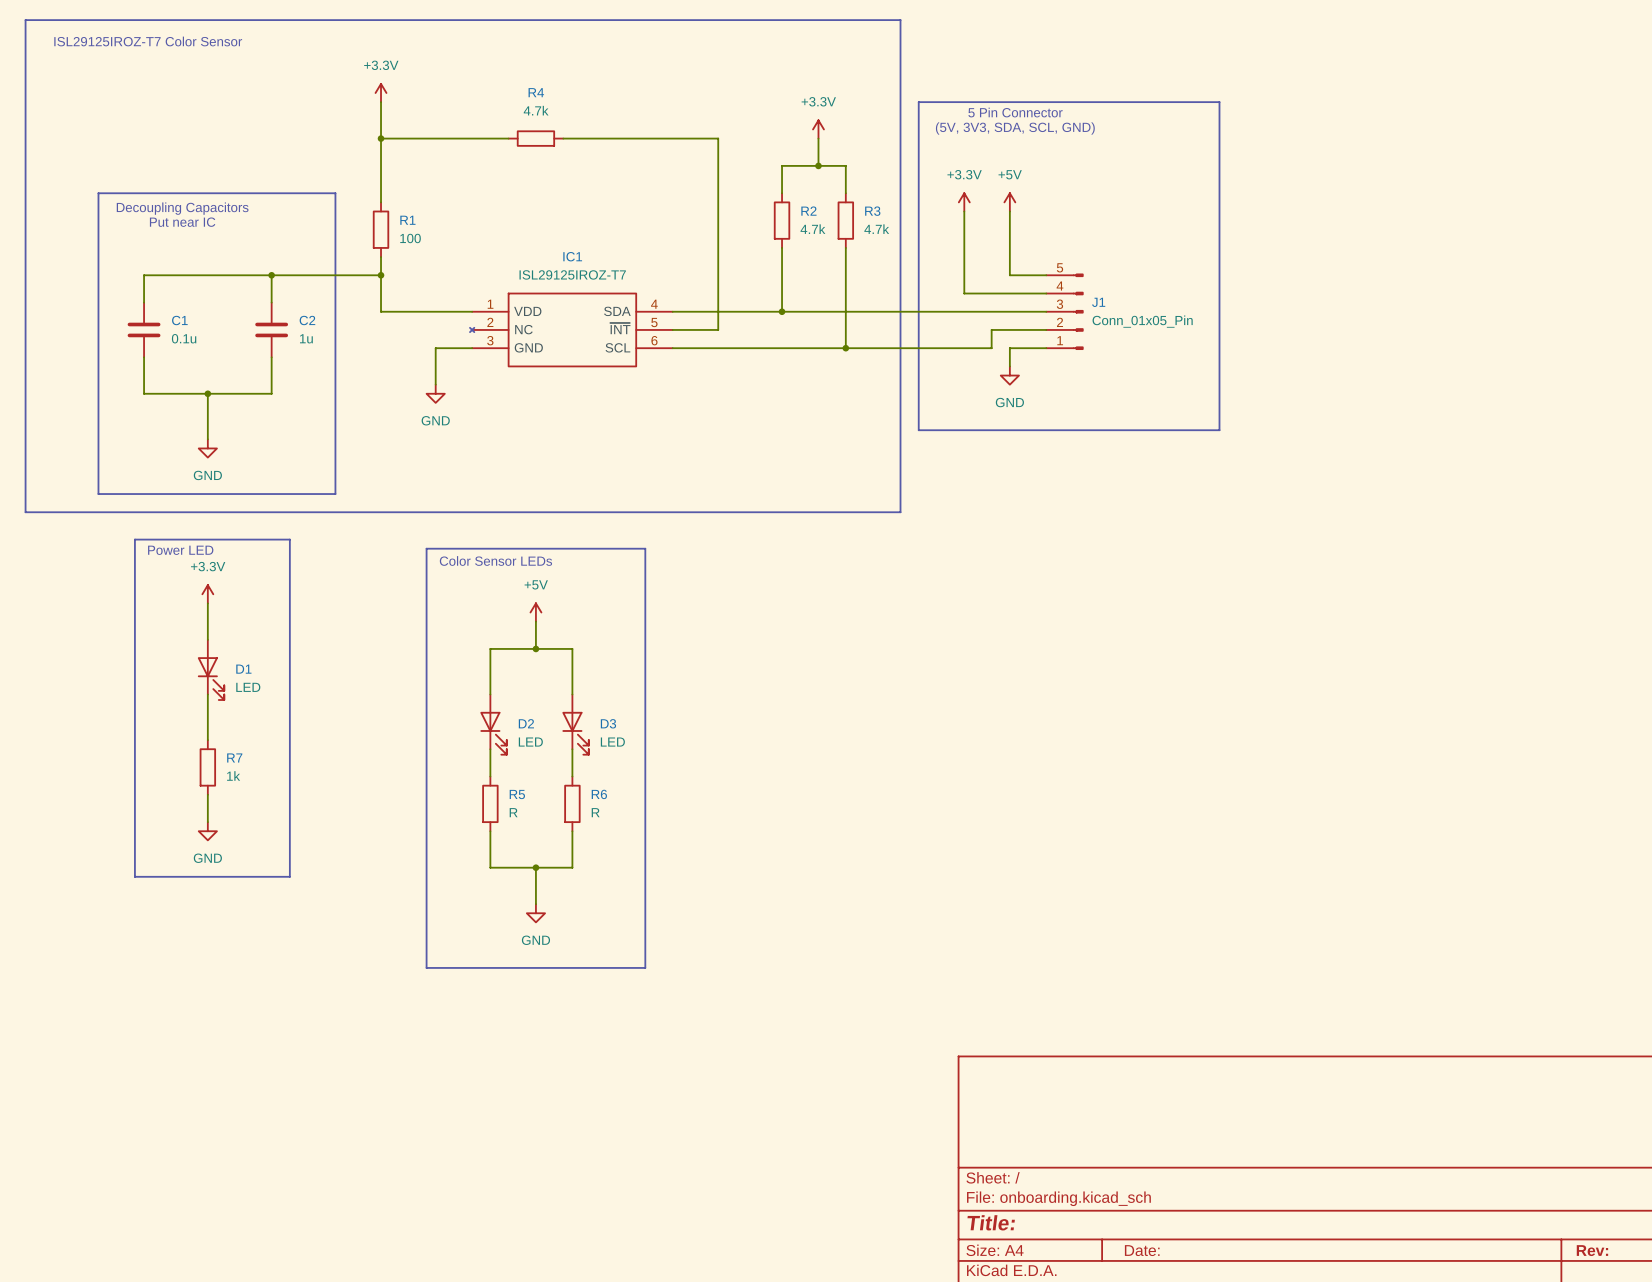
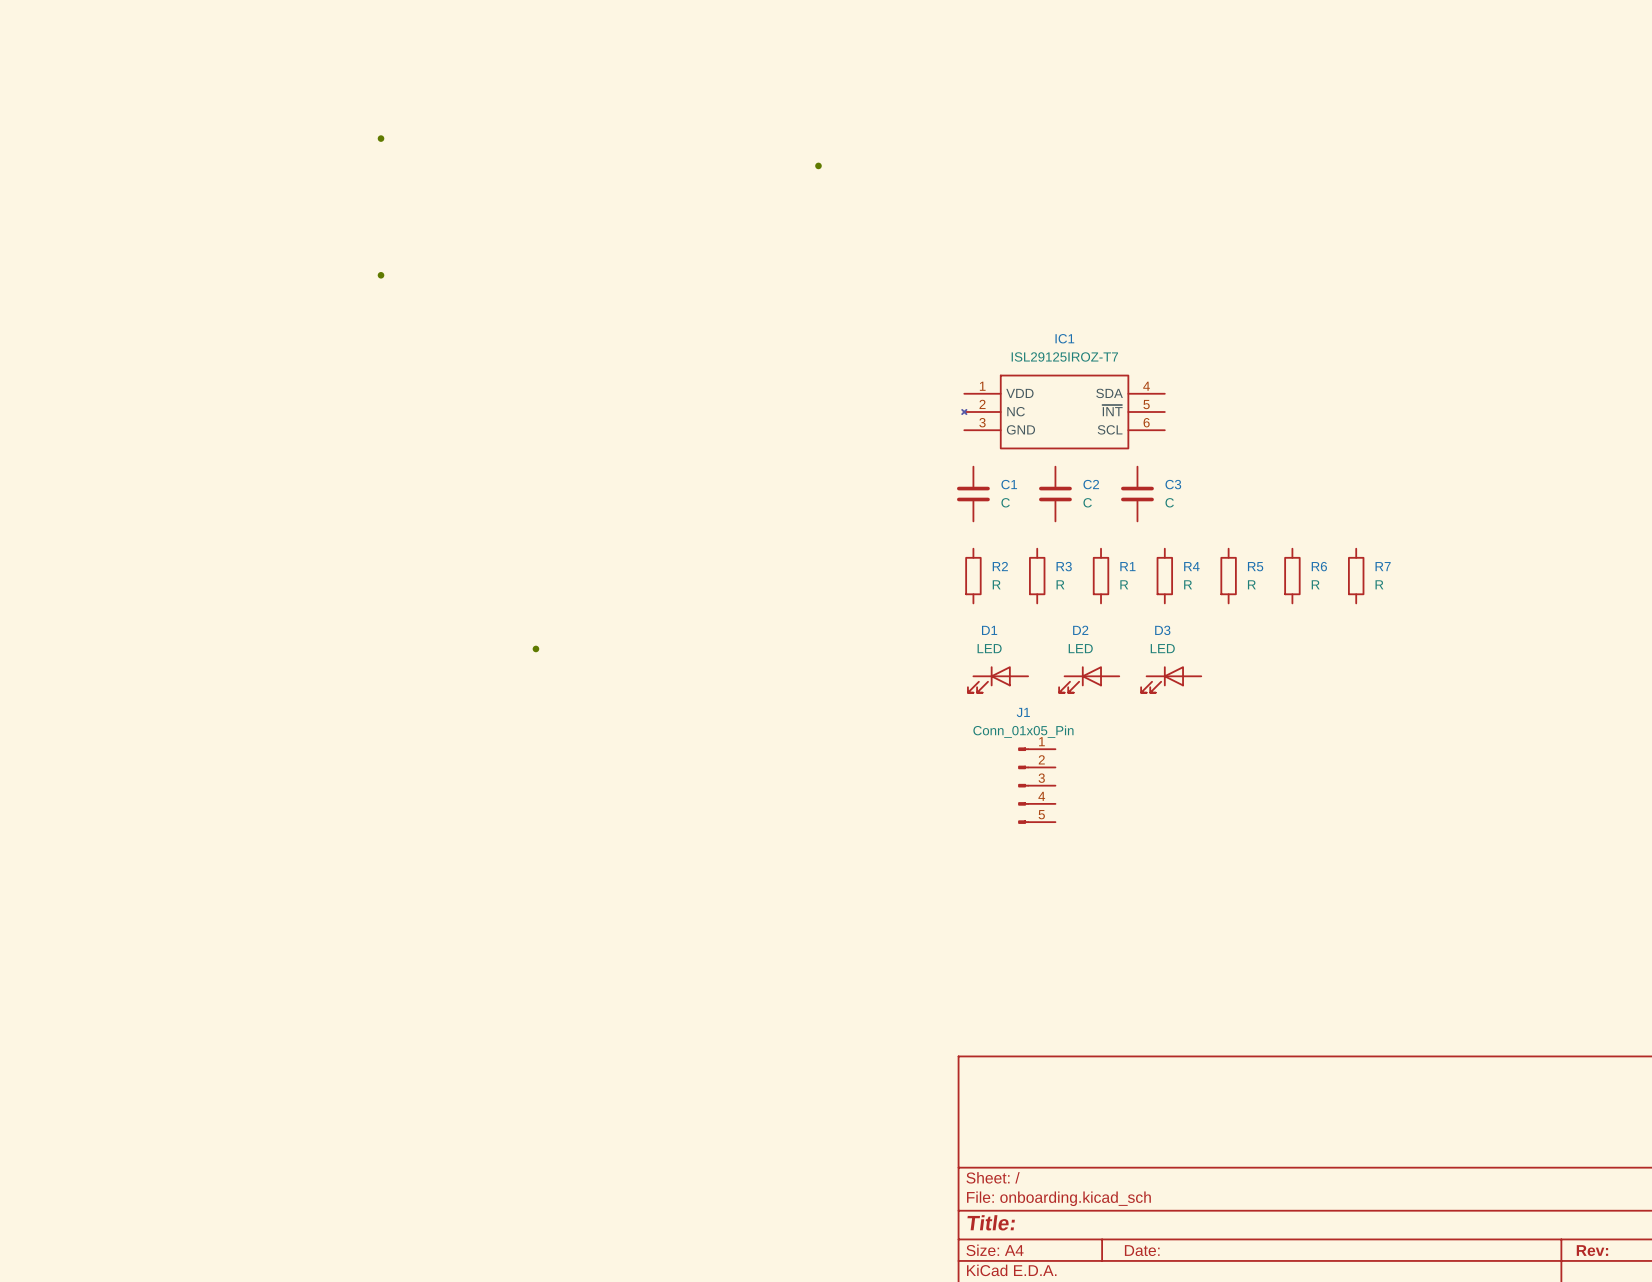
line: (25, 20) (900, 20) (900, 512) (25, 512) (25, 20) -> none
text: ISL29125IROZ-T7 Color Sensor (148, 41) -> none
R4 name position: R4 (536, 92) -> R4 (1191, 566)
power symbol: +3.3V (381, 93) -> none
wire: (381, 102) (381, 202) -> none
line: (918, 102) (1219, 102) (1219, 430) (918, 430) (918, 102) -> none
R4 value: 4.7k (536, 110) -> R (1188, 584)
text: 5 Pin Connector (1015, 112) -> none
text: (5V, 3V3, SDA, SCL, GND) (1015, 128) -> none
power symbol: +3.3V (818, 129) -> none
wire: (381, 138) (508, 138) -> none
R4 rotation: 0° (535, 138) -> 90° clockwise (1164, 576)
R4 position: (535, 138) -> (1164, 576)
wire: (563, 138) (718, 138) (718, 329) (672, 329) -> none
wire: (818, 138) (818, 165) -> none
line: (98, 193) (335, 193) (335, 494) (98, 494) (98, 193) -> none
wire: (782, 193) (782, 165) (845, 165) (845, 193) -> none
power symbol: +3.3V (964, 202) -> none
power symbol: +5V (1009, 202) -> none
text: Decoupling Capacitors (182, 208) -> none
wire: (964, 211) (964, 293) (1046, 293) -> none
wire: (1009, 211) (1009, 275) (1046, 275) -> none
R2 position: (782, 220) -> (973, 576)
R3 position: (845, 220) -> (1037, 576)
text: Put near IC (182, 222) -> none
R1 position: (381, 229) -> (1101, 576)
R2 value: 4.7k (812, 229) -> R (996, 584)
R3 value: 4.7k (876, 229) -> R (1060, 584)
R1 value: 100 (410, 238) -> R (1124, 584)
wire: (782, 247) (782, 311) -> none
wire: (845, 247) (845, 348) -> none
wire: (381, 257) (381, 311) (472, 311) -> none
wire: (271, 275) (271, 302) -> none
junction: (271, 275) -> none
wire: (381, 275) (144, 275) (144, 302) -> none
J1 name position: J1 (1098, 302) -> J1 (1023, 712)
wire: (672, 311) (1046, 311) -> none
junction: (782, 311) -> none
J1 position: (1064, 311) -> (1036, 785)
J1 rotation: 0° (1078, 311) -> 180° (1023, 785)
J1 value position: Conn_01x05_Pin (1142, 321) -> Conn_01x05_Pin (1023, 731)
C1 position: (144, 329) -> (973, 494)
C2 position: (271, 329) -> (1055, 494)
IC1 position: (571, 329) -> (1063, 412)
wire: (1046, 329) (991, 329) (991, 348) (672, 348) -> none
C1 value: 0.1u (184, 338) -> C (1005, 502)
C2 value: 1u (306, 338) -> C (1087, 502)
wire: (472, 348) (435, 348) (435, 384) -> none
junction: (845, 348) -> none
wire: (1046, 348) (1009, 348) (1009, 366) -> none
wire: (144, 357) (144, 393) (271, 393) (271, 357) -> none
power symbol: GND (1009, 375) -> none
wire: (207, 393) (207, 439) -> none
junction: (207, 393) -> none
power symbol: GND (435, 393) -> none
power symbol: GND (207, 448) -> none
C3: none -> C (1137, 494)
line: (134, 539) (289, 539) (289, 876) (134, 876) (134, 539) -> none
line: (426, 548) (645, 548) (645, 967) (426, 967) (426, 548) -> none
text: Power LED (180, 550) -> none
text: Color Sensor LEDs (495, 560) -> none
power symbol: +3.3V (207, 594) -> none
wire: (207, 603) (207, 639) -> none
power symbol: +5V (535, 612) -> none
wire: (535, 621) (535, 648) -> none
D1 position: (211, 669) -> (998, 679)
D1 name position: D1 (243, 669) -> D1 (989, 630)
D1 rotation: 0° (211, 678) -> 90° clockwise (989, 679)
D1 value position: LED (248, 687) -> LED (989, 648)
wire: (207, 694) (207, 740) -> none
wire: (490, 694) (490, 648) (572, 648) (572, 694) -> none
D2 name position: D2 (526, 723) -> D2 (1080, 630)
D3 name position: D3 (608, 723) -> D3 (1162, 630)
D2 position: (493, 724) -> (1089, 679)
D3 position: (575, 724) -> (1171, 679)
D2 rotation: 0° (493, 733) -> 90° clockwise (1080, 679)
D3 rotation: 0° (575, 733) -> 90° clockwise (1162, 679)
D2 value position: LED (530, 742) -> LED (1080, 648)
D3 value position: LED (612, 742) -> LED (1162, 648)
wire: (490, 749) (490, 776) -> none
wire: (572, 749) (572, 776) -> none
R7 position: (207, 767) -> (1356, 576)
R7 value: 1k (233, 775) -> R (1379, 584)
wire: (207, 794) (207, 822) -> none
R5 position: (490, 803) -> (1228, 576)
R6 position: (572, 803) -> (1292, 576)
power symbol: GND (207, 831) -> none
wire: (490, 831) (490, 867) (572, 867) (572, 831) -> none
wire: (535, 867) (535, 904) -> none
junction: (535, 867) -> none
power symbol: GND (535, 913) -> none

